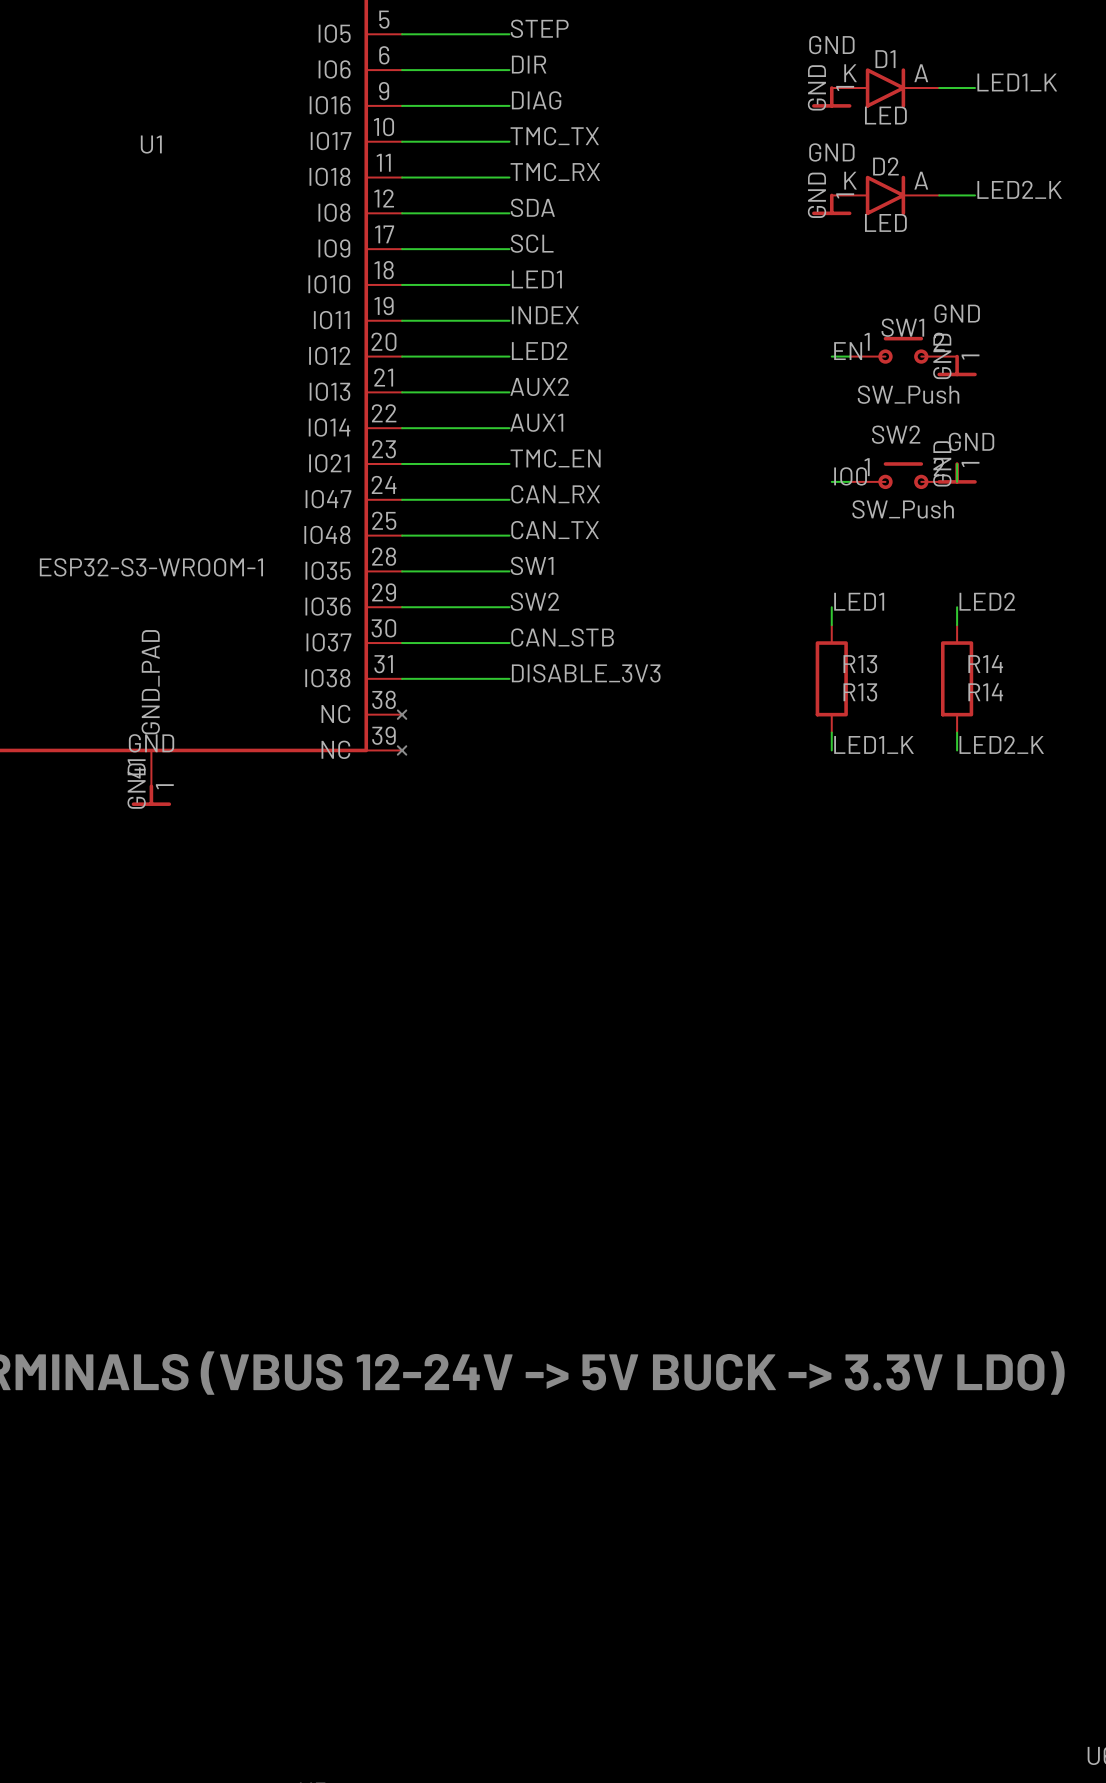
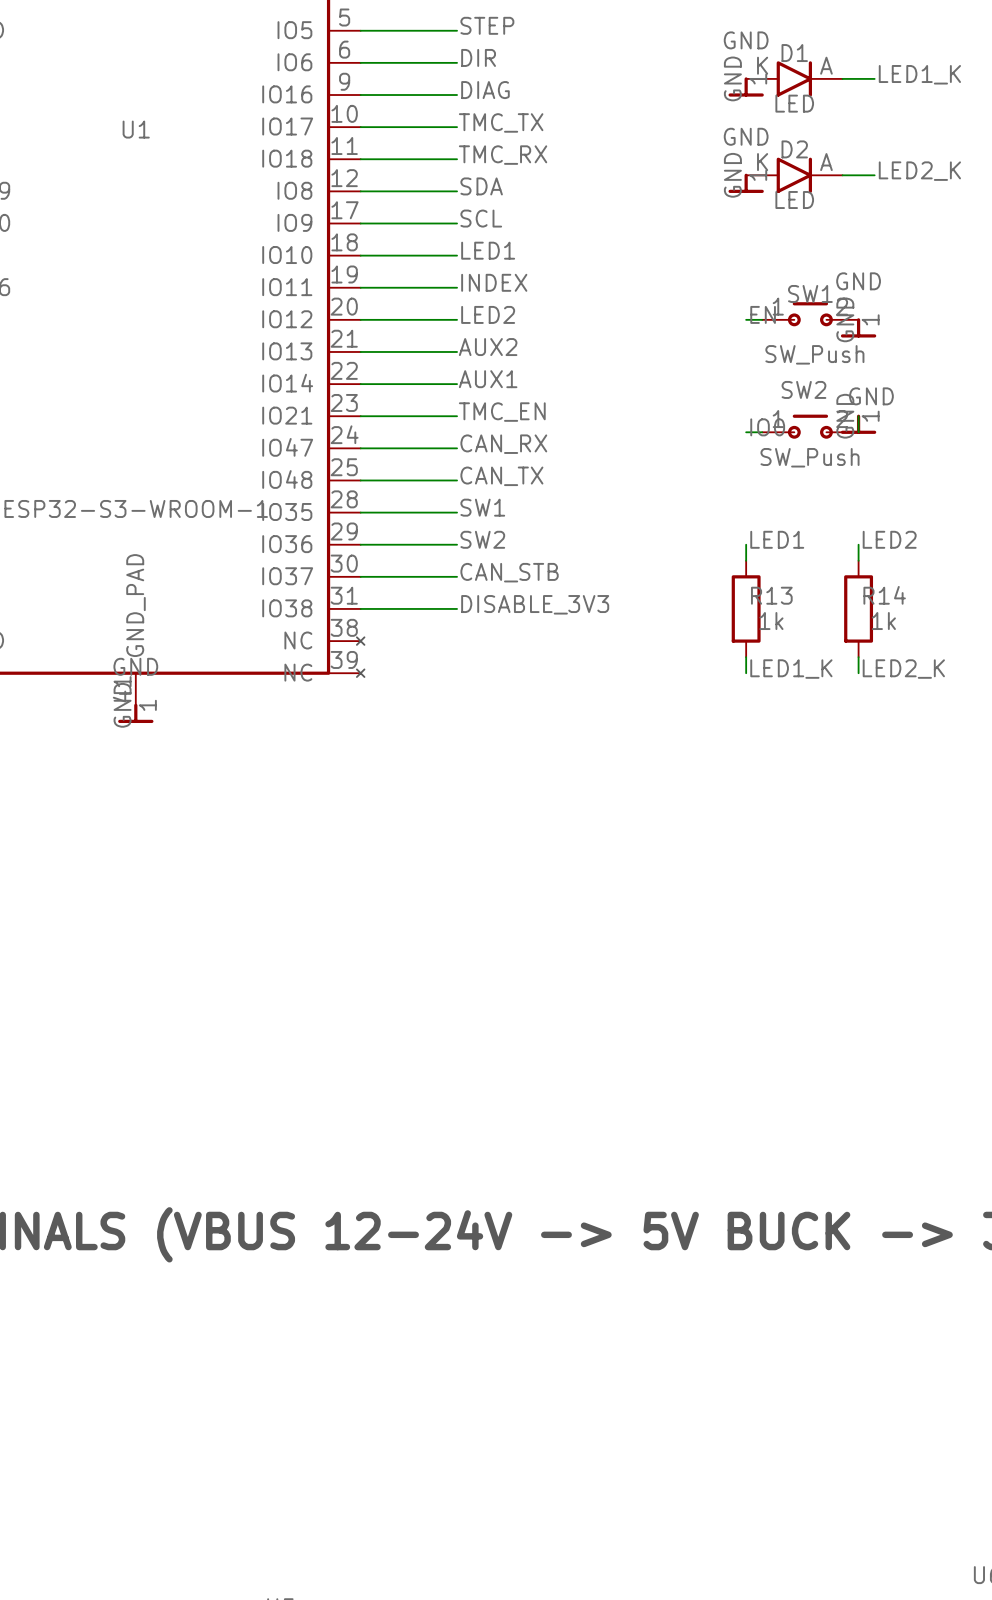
R13 value: R13 (860, 692) -> 1k (771, 621)
R14 value: R14 (985, 692) -> 1k (883, 621)

